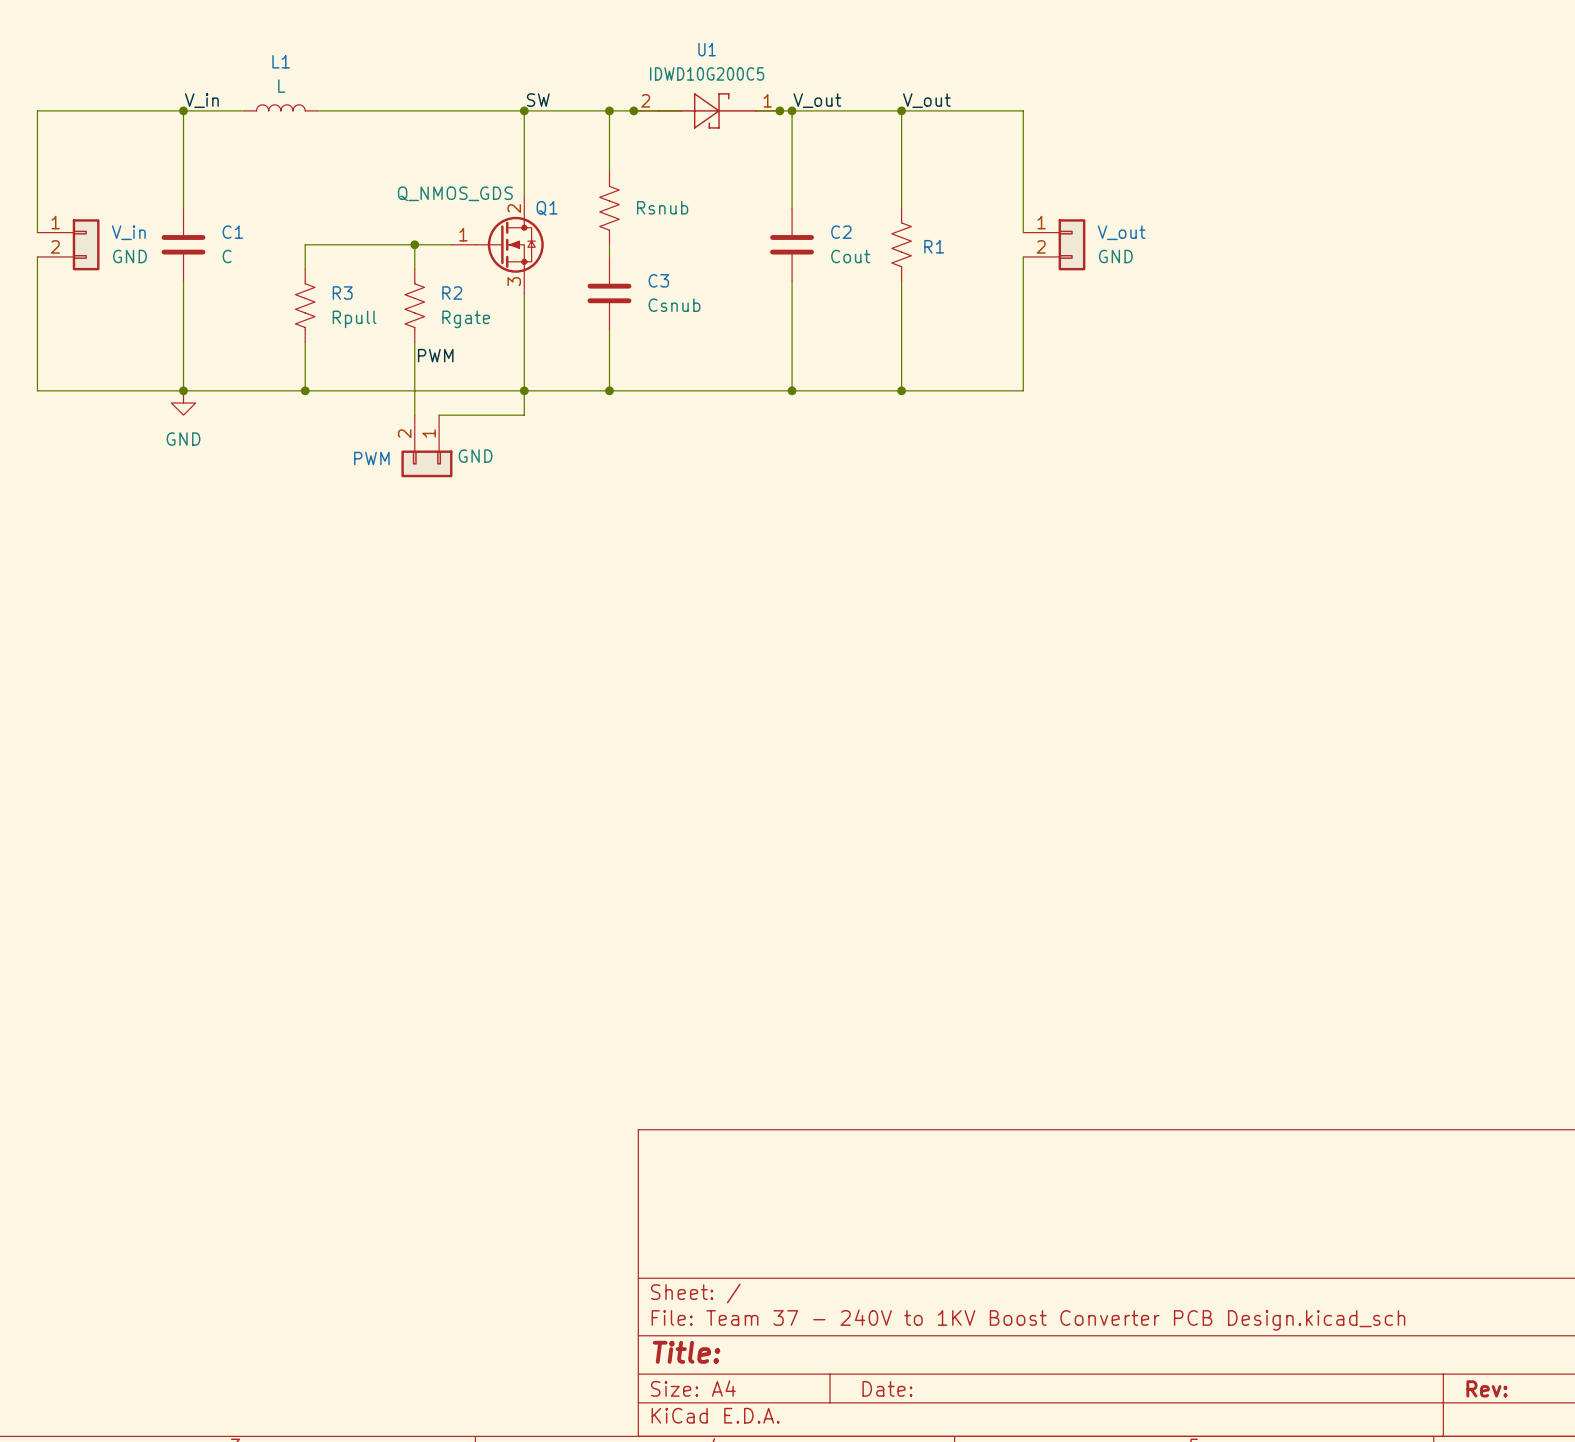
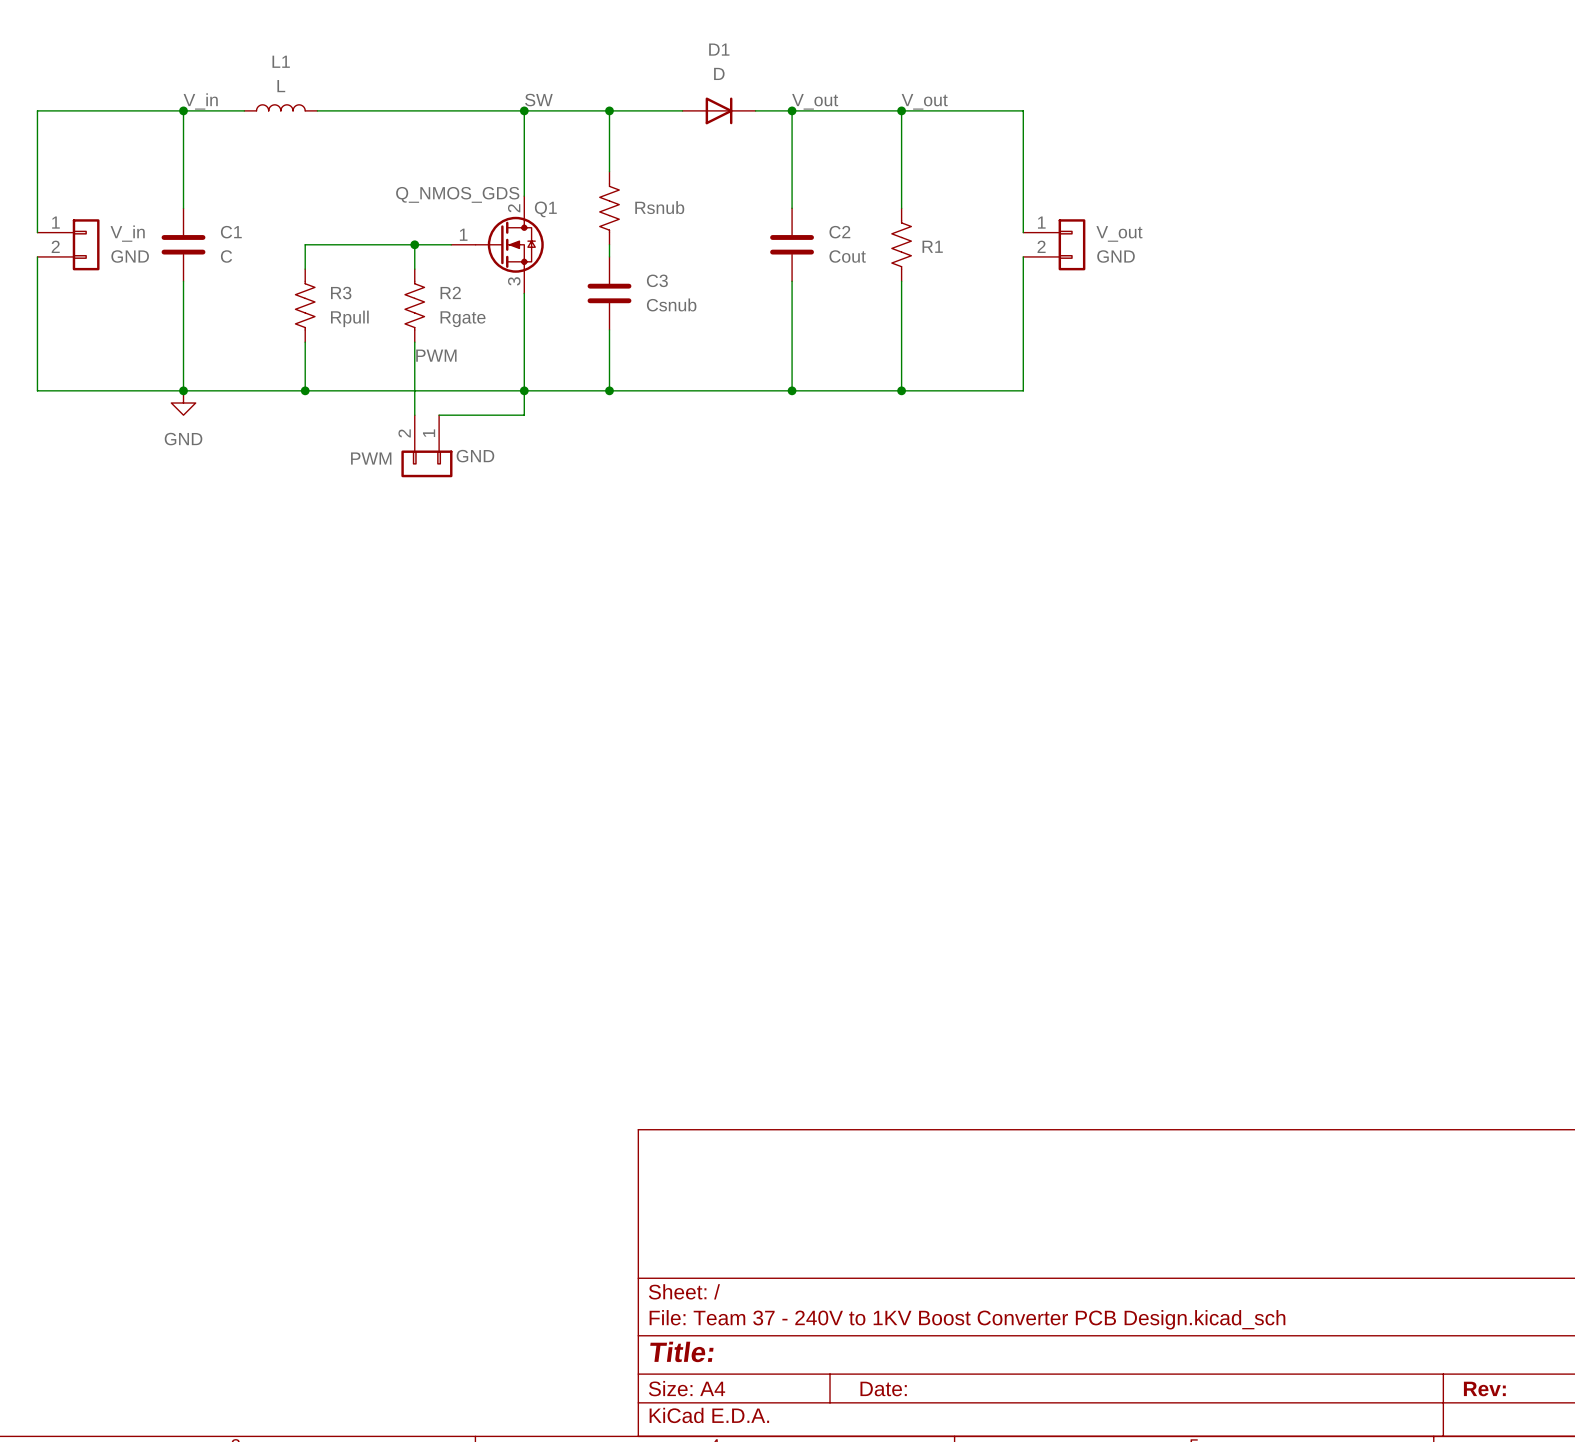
junction: (633, 110) -> none
U1: IDWD10G200C5 (706, 110) -> none
D1: none -> D (719, 110)
junction: (779, 110) -> none

